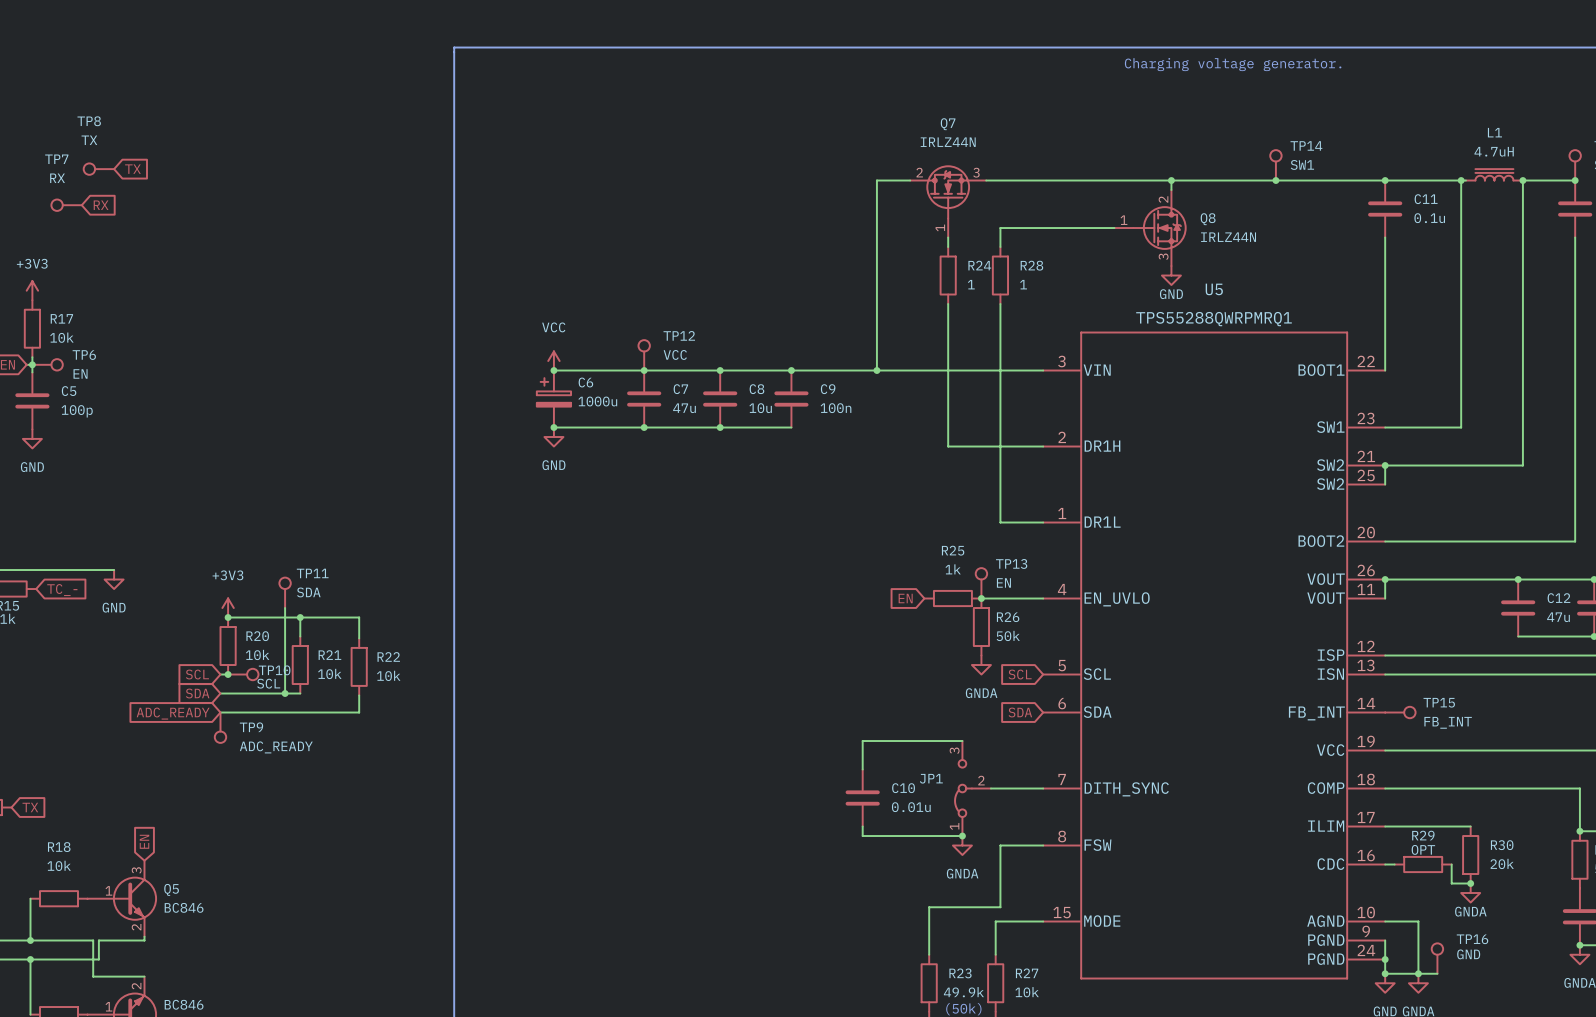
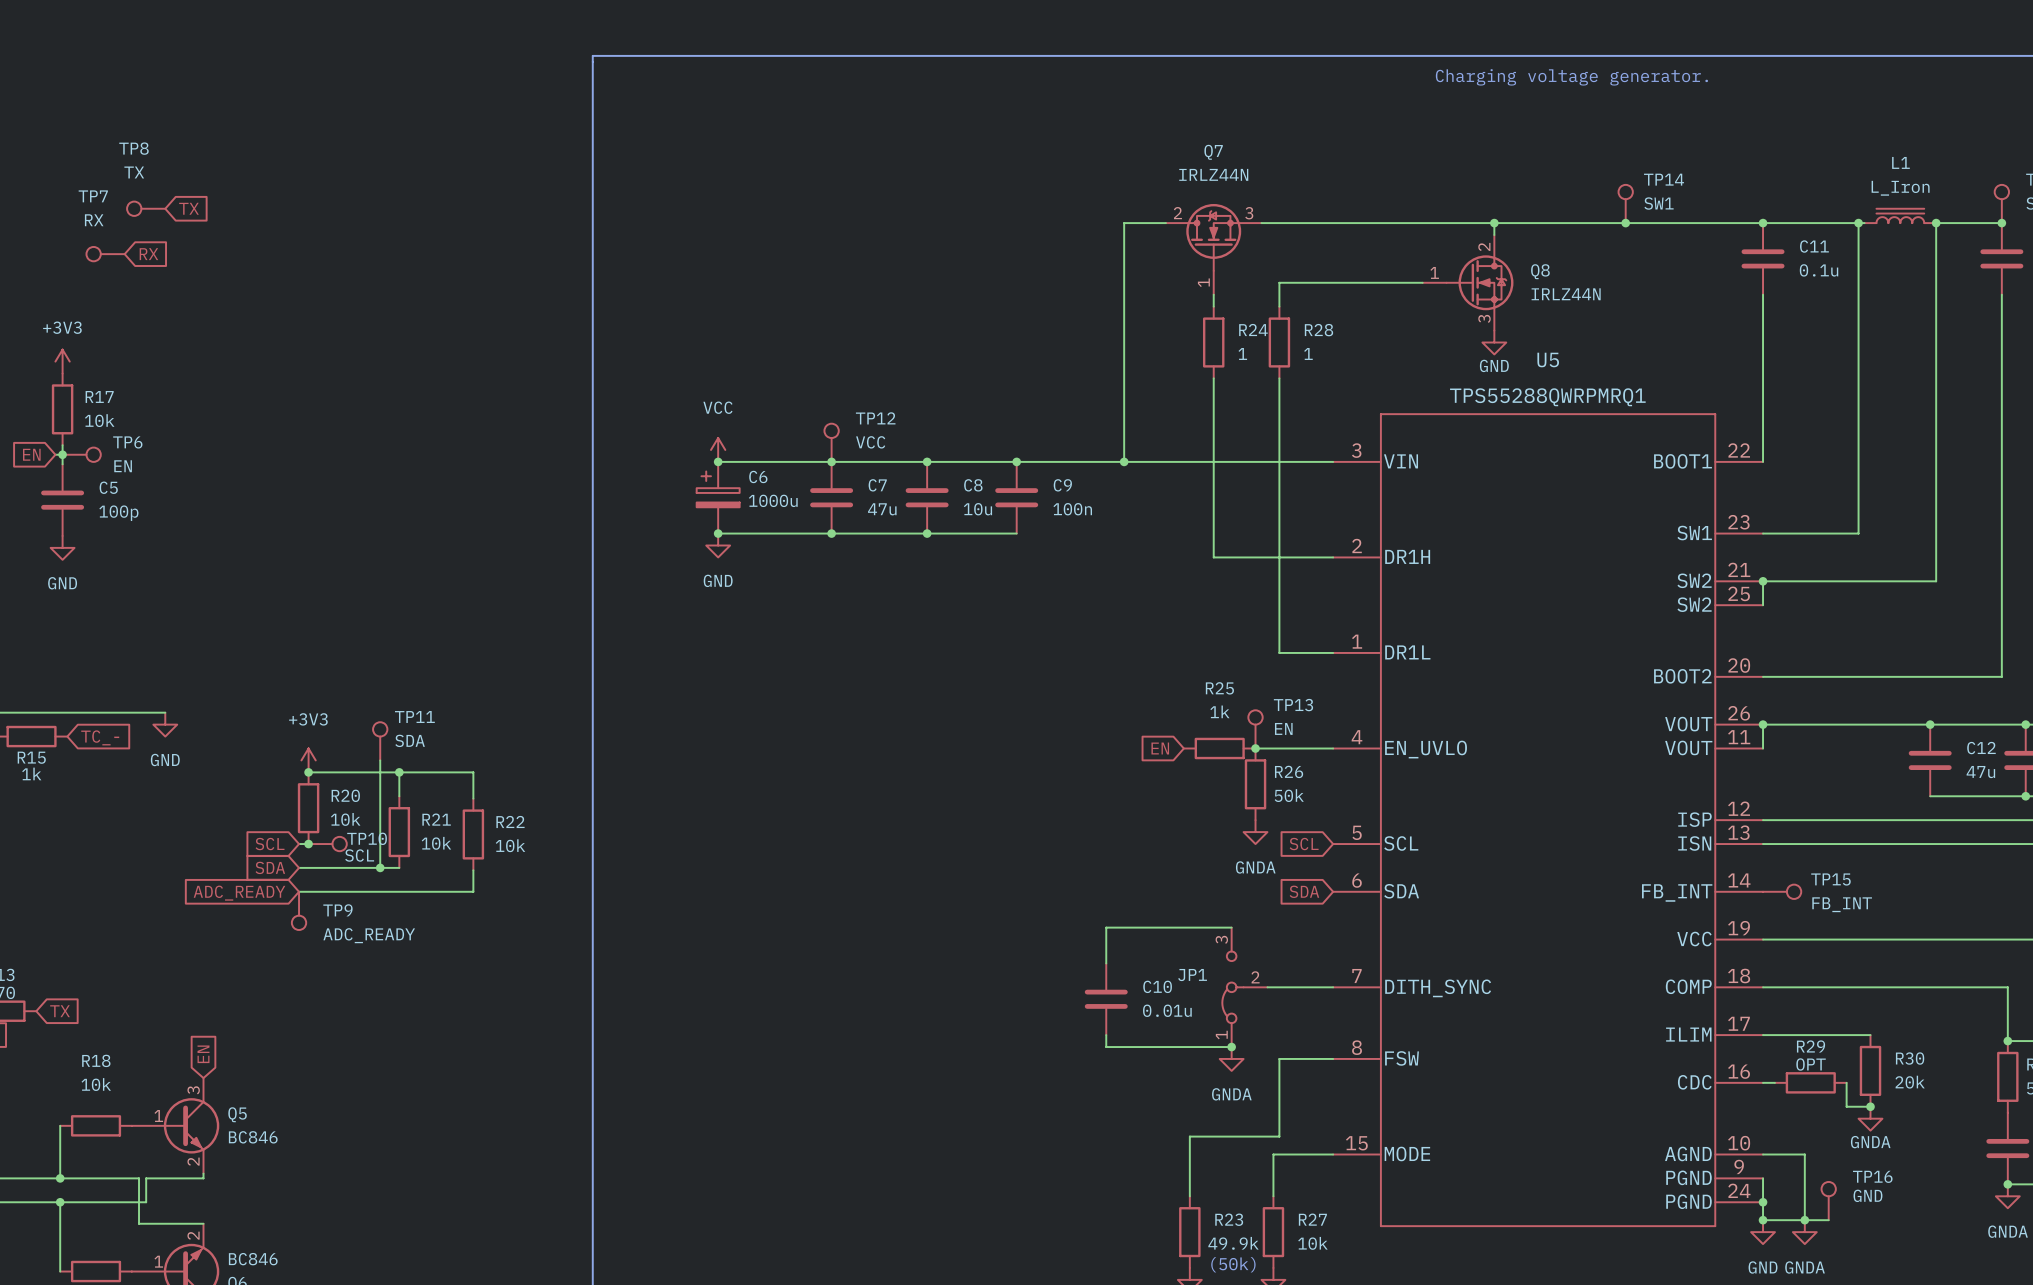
L1 value: 4.7uH (1494, 151) -> L_Iron (1900, 188)

